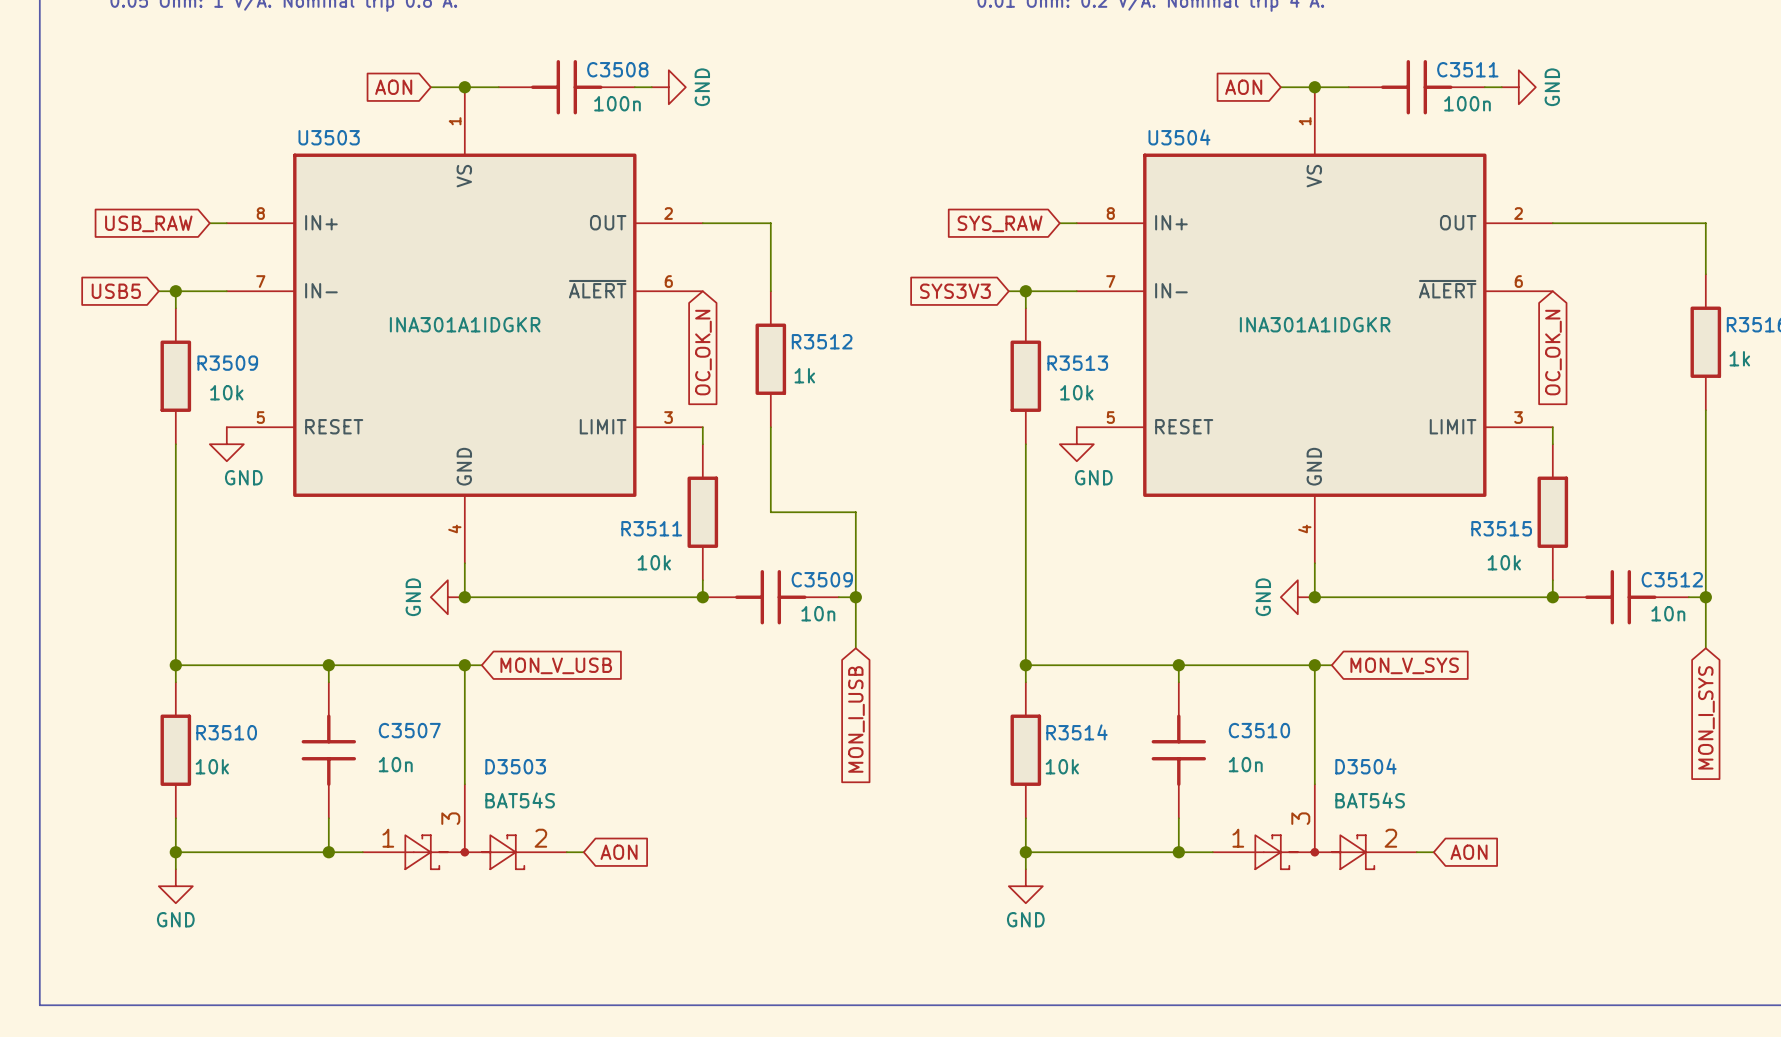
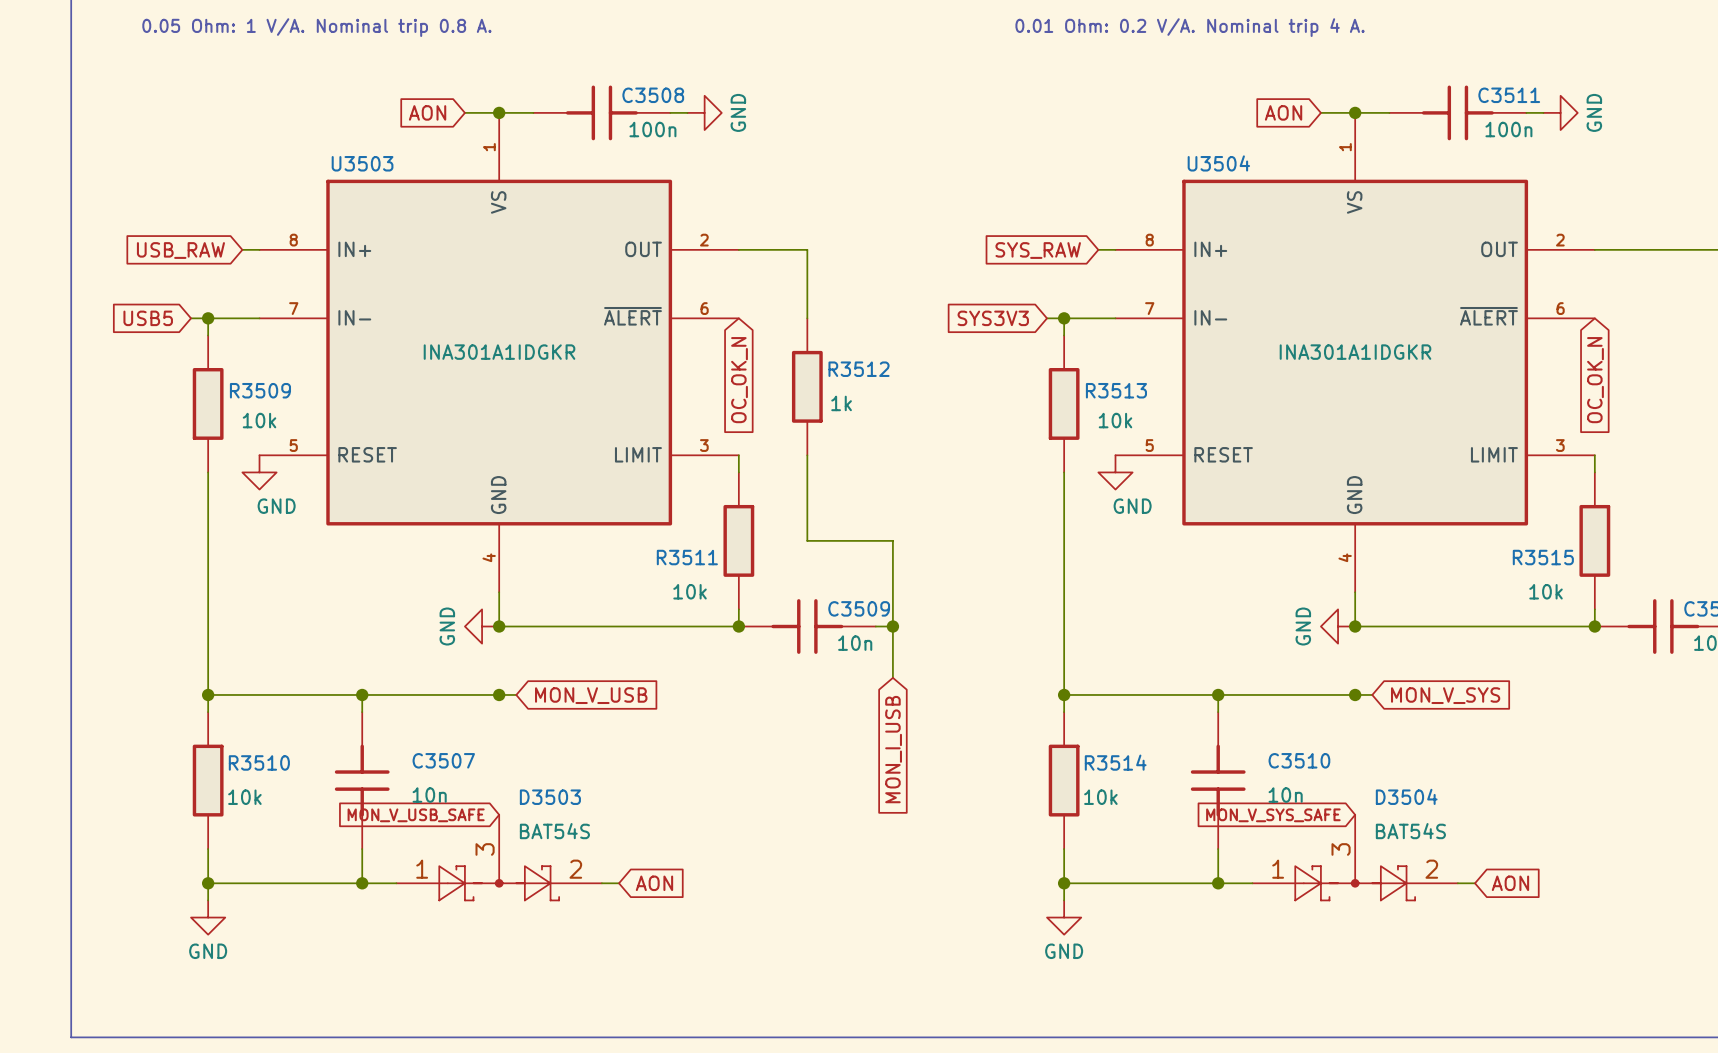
wire: (464, 665) (464, 784) -> none
wire: (1314, 665) (1314, 784) -> none
global label: none -> MON_V_USB_SAFE (416, 815)
global label: none -> MON_V_SYS_SAFE (1273, 815)

